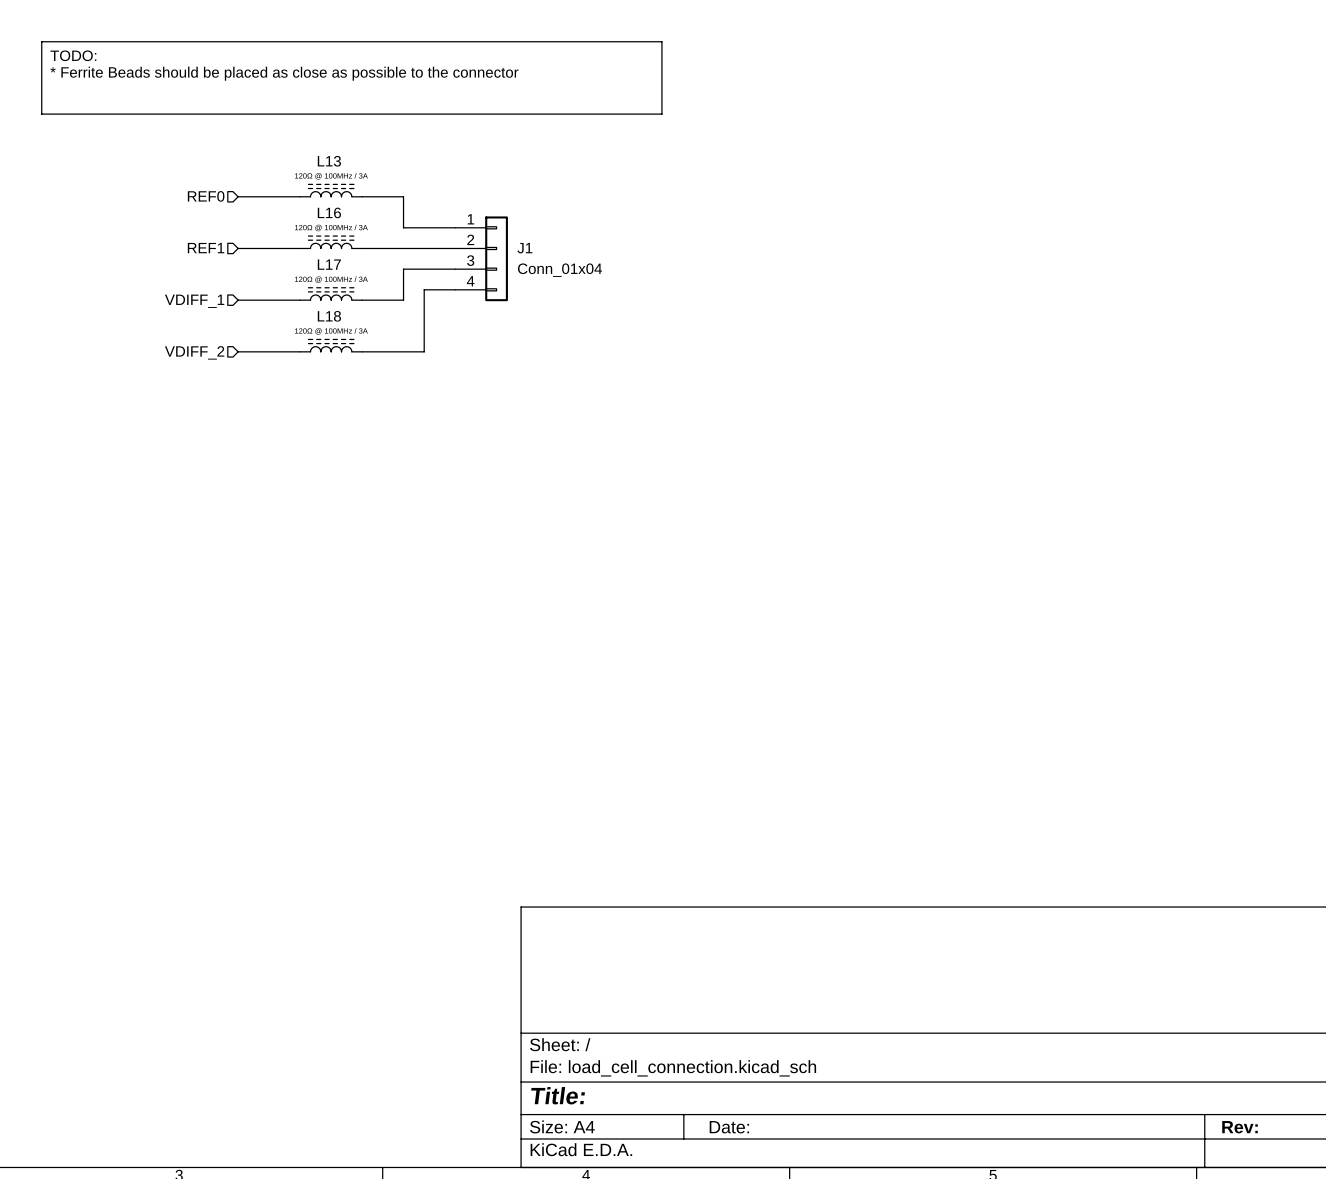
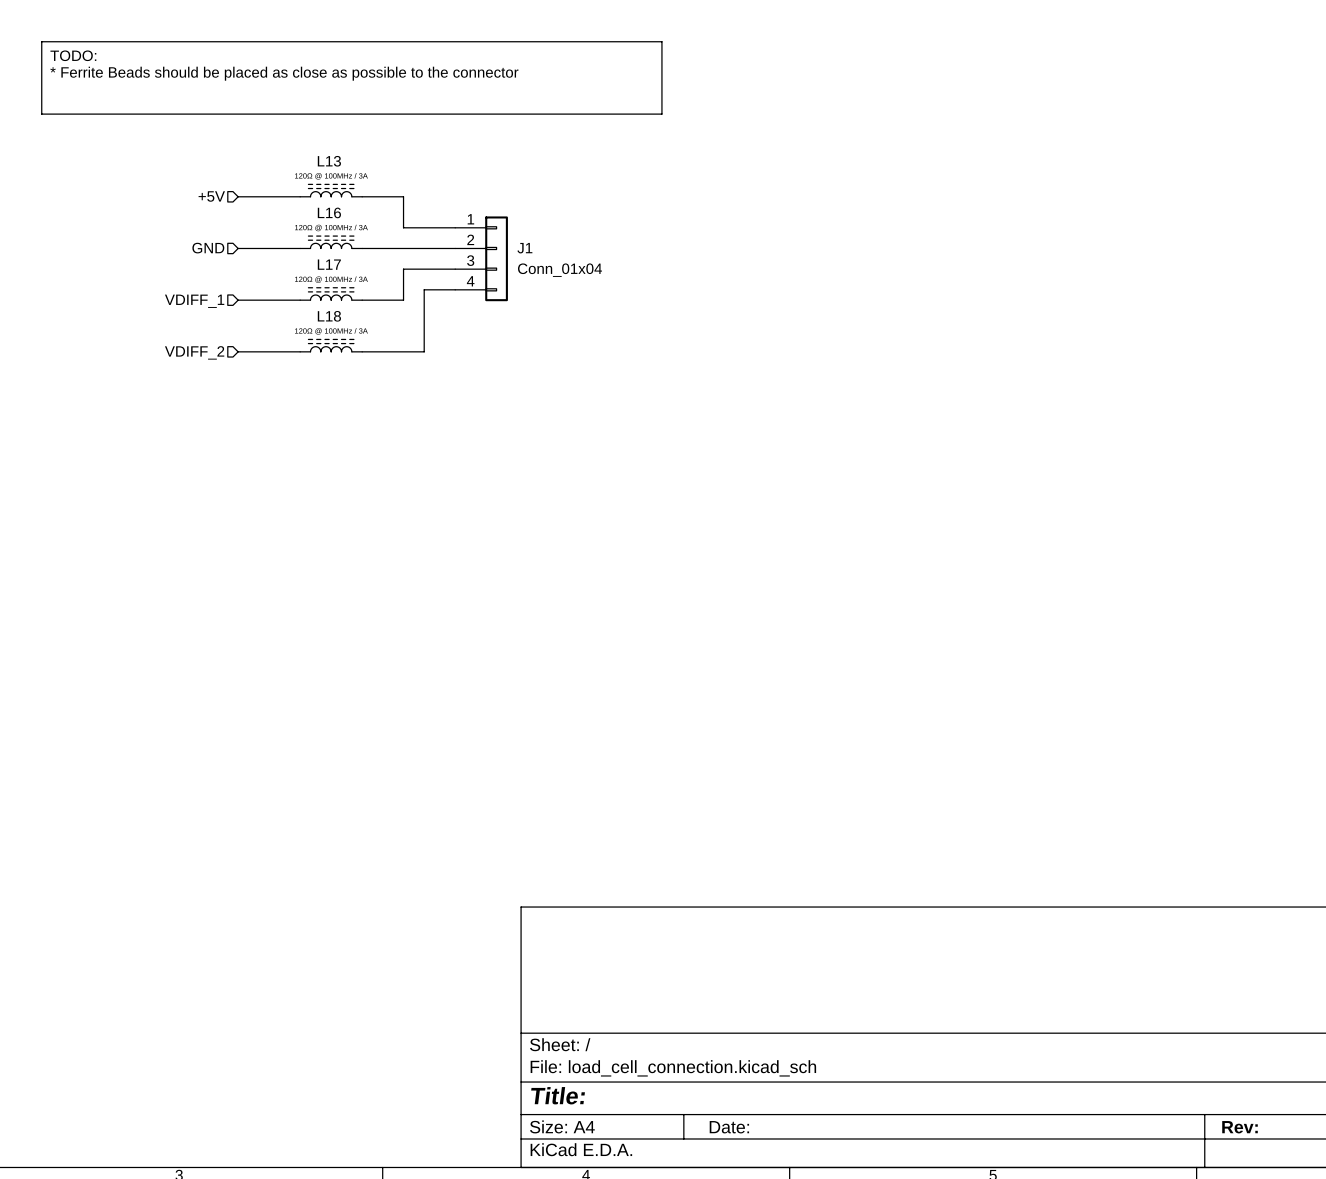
hierarchical label: REF0 (206, 196) -> +5V (211, 196)
hierarchical label: REF1 (206, 248) -> GND (208, 248)

